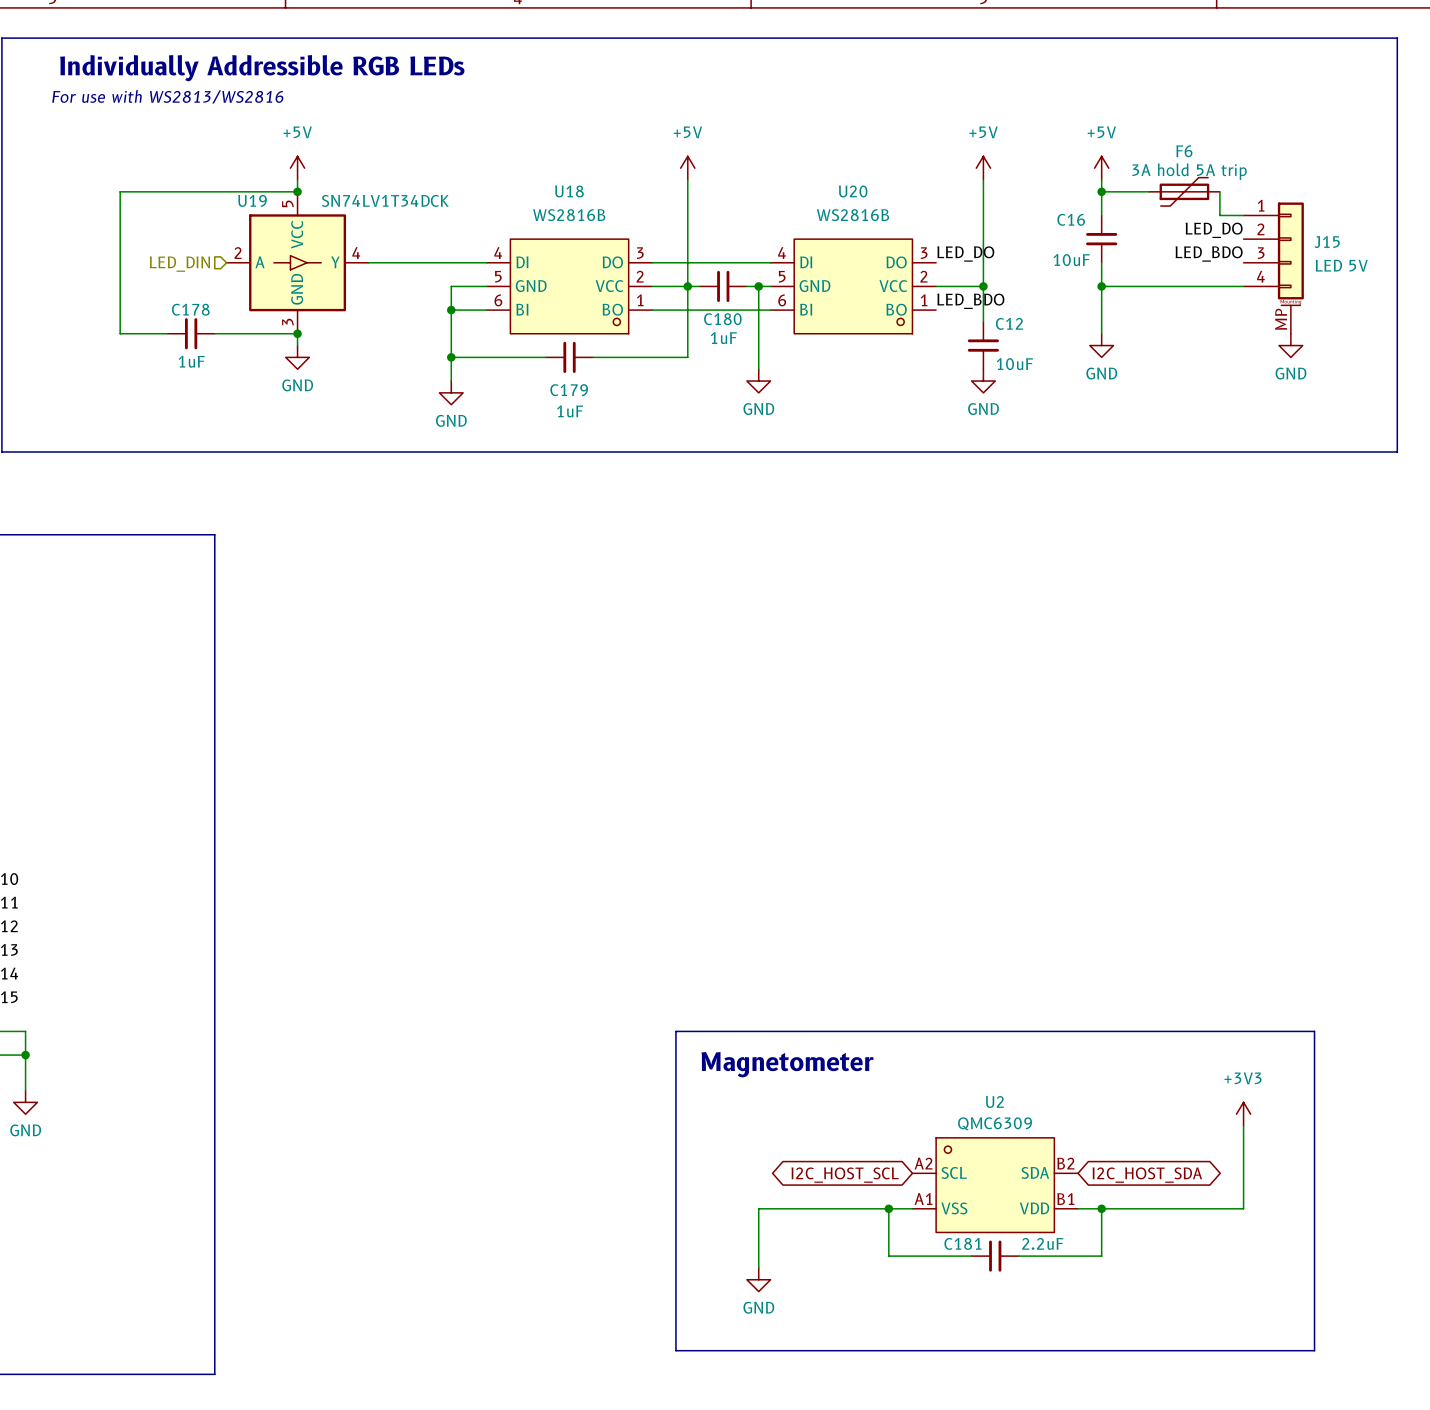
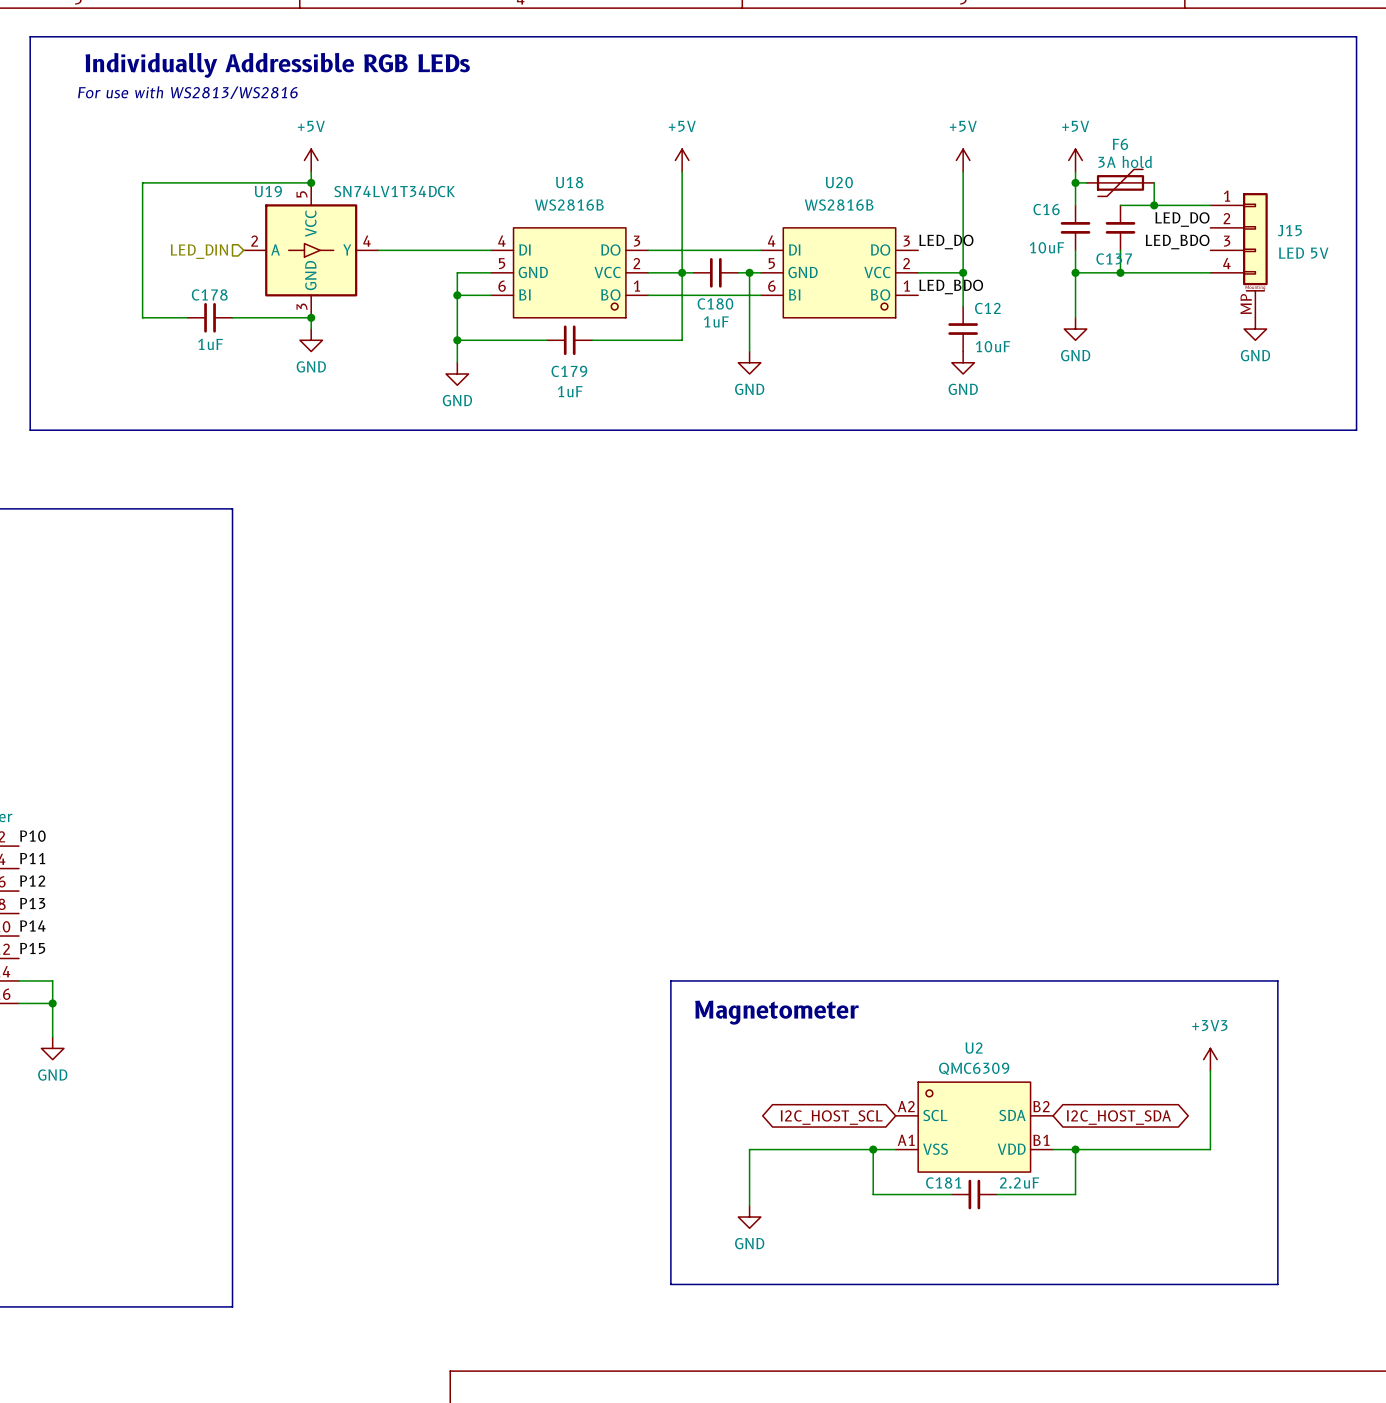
F6 value: 3A hold 5A trip (1189, 171) -> 3A hold (1125, 161)
wire: none -> (1154, 182) (1154, 205)
F6 position: (1184, 191) -> (1120, 182)
wire: (1219, 191) (1219, 215) -> (1120, 205) (1187, 205)
junction: none -> (1154, 205)
C137: none -> (1120, 227)
wire: none -> (1120, 250) (1120, 272)
junction: none -> (1120, 272)

